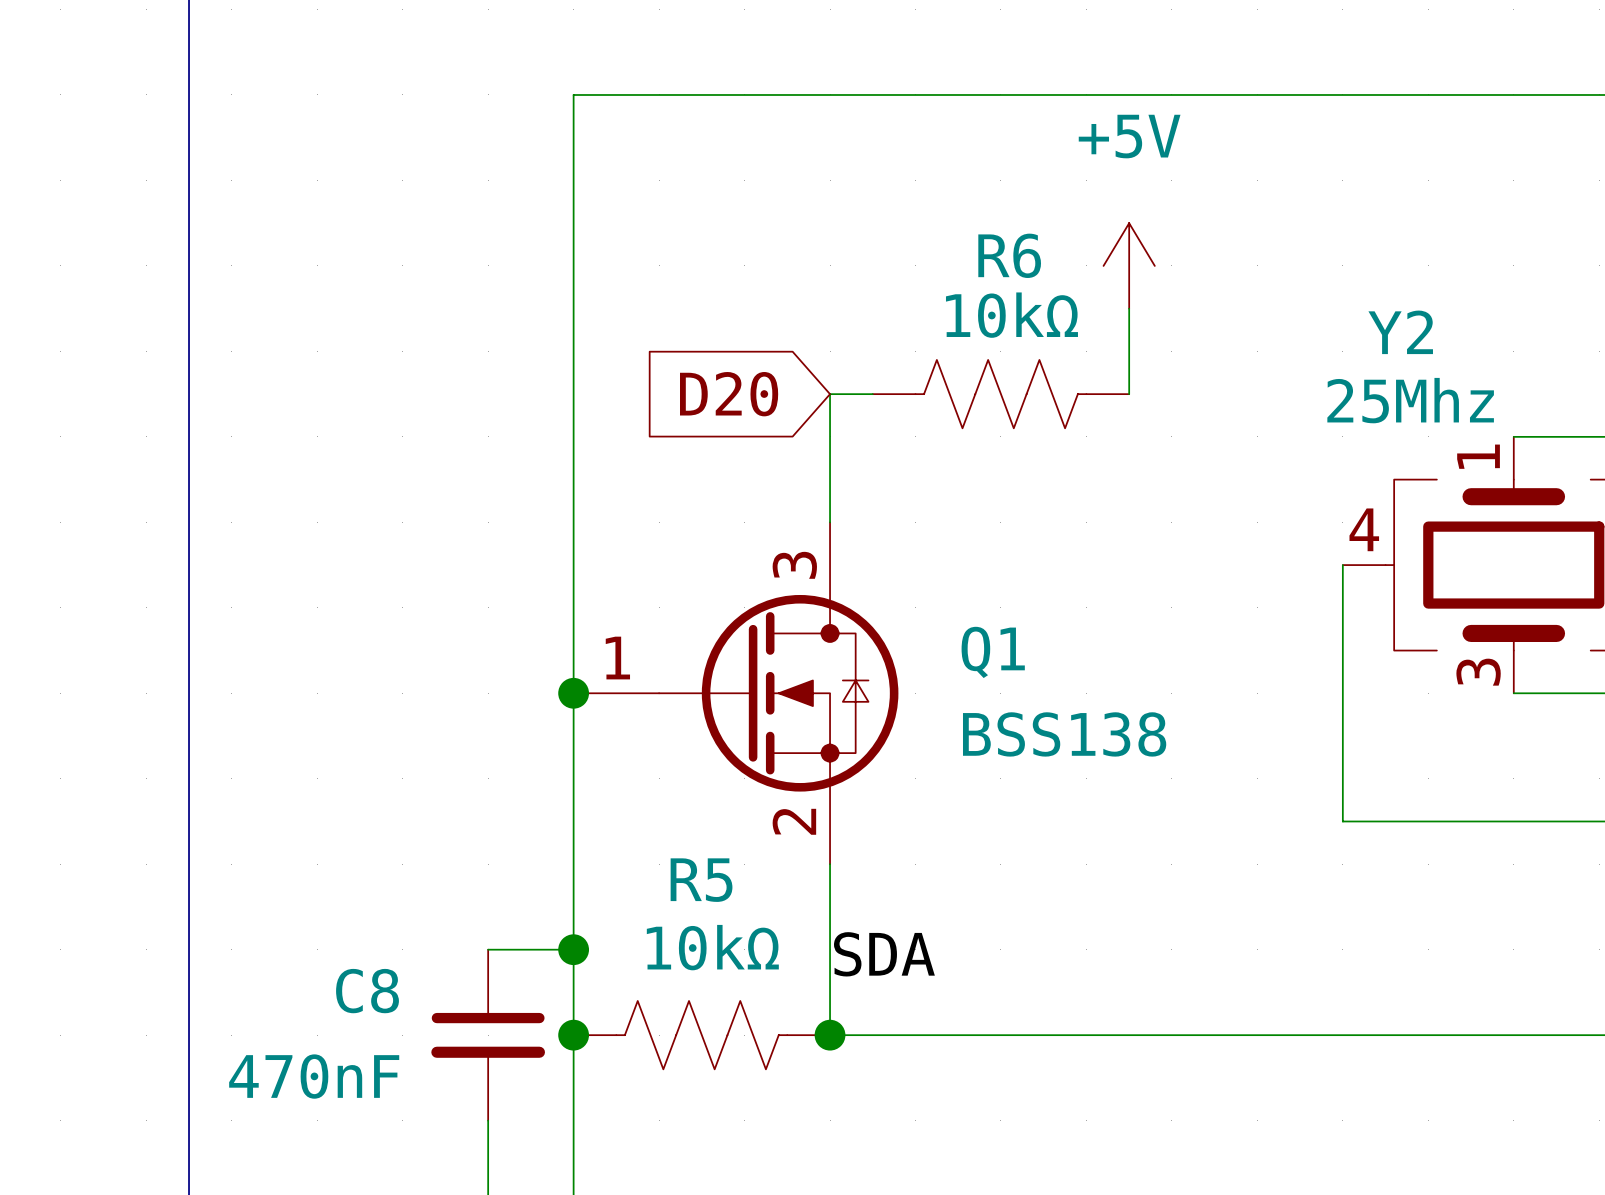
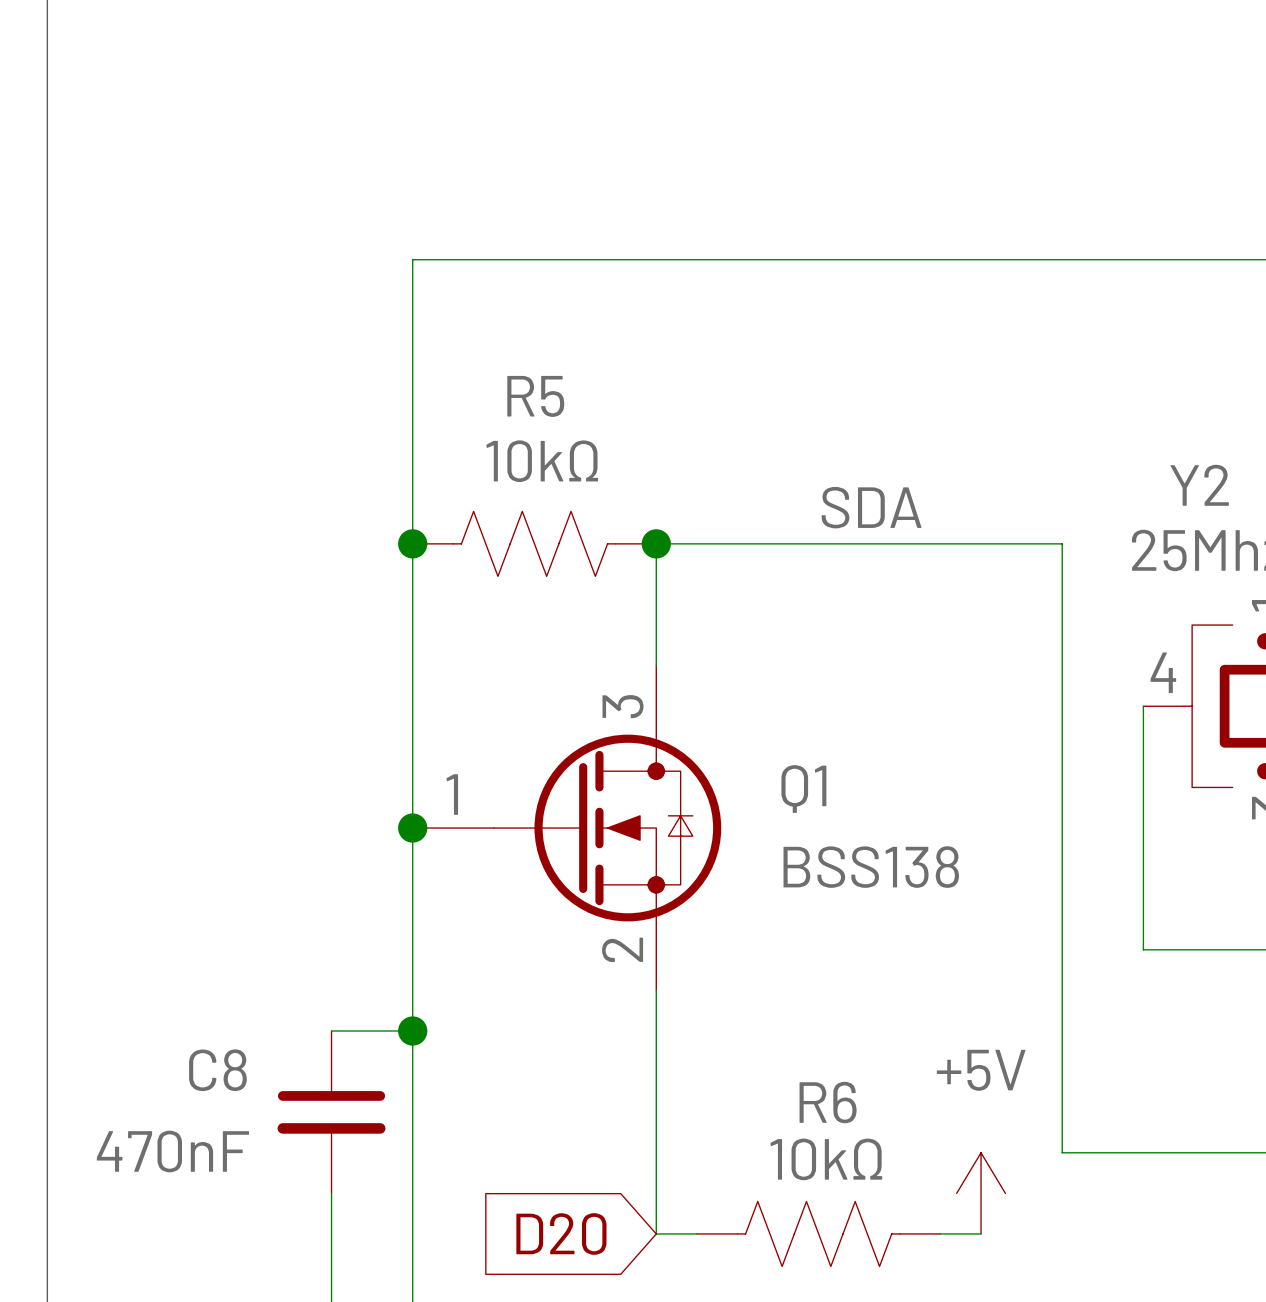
power symbol: +5V (1129, 265) -> none
wire: (1129, 308) (1129, 394) -> none
junction: none -> (412, 543)
global label position: D20 (729, 394) -> D20 (561, 1234)
junction: none -> (656, 543)
wire: none -> (696, 543) (1062, 543) (1062, 1152)
R6 position: (1000, 394) -> (818, 1233)
wire: (488, 949) (573, 949) -> (331, 1031) (412, 1031)
junction position: (573, 949) -> (412, 1031)
label position: SDA (884, 954) -> SDA (871, 507)
C8 position: (488, 1035) -> (331, 1112)
junction: (573, 1035) -> none
R5 position: (701, 1035) -> (534, 543)
wire: (830, 1035) (1257, 1035) -> (656, 1152) (656, 1233) (696, 1233)
junction: (830, 1035) -> none
power symbol: none -> +5V (981, 1193)
wire: none -> (940, 1233) (981, 1233)

